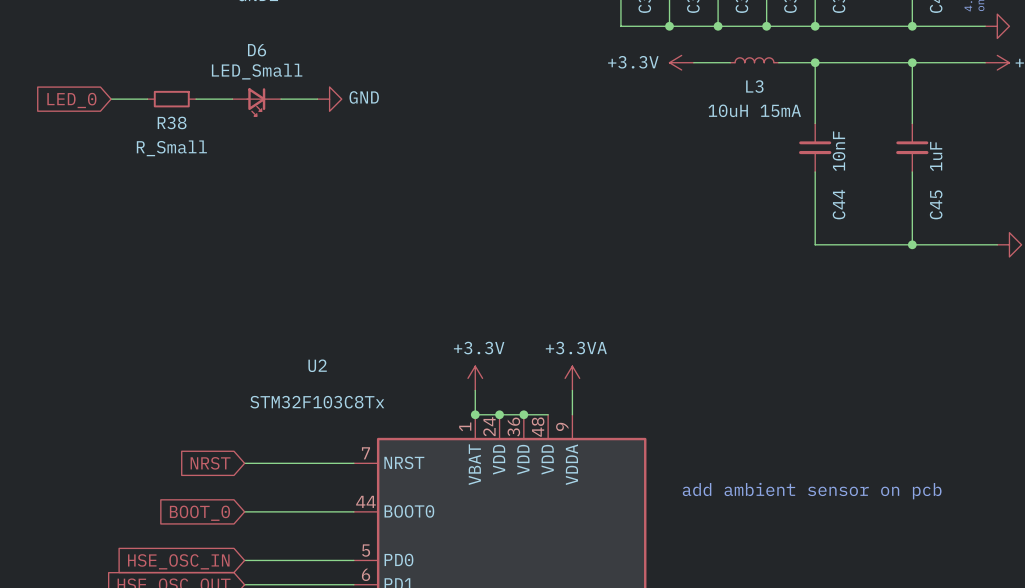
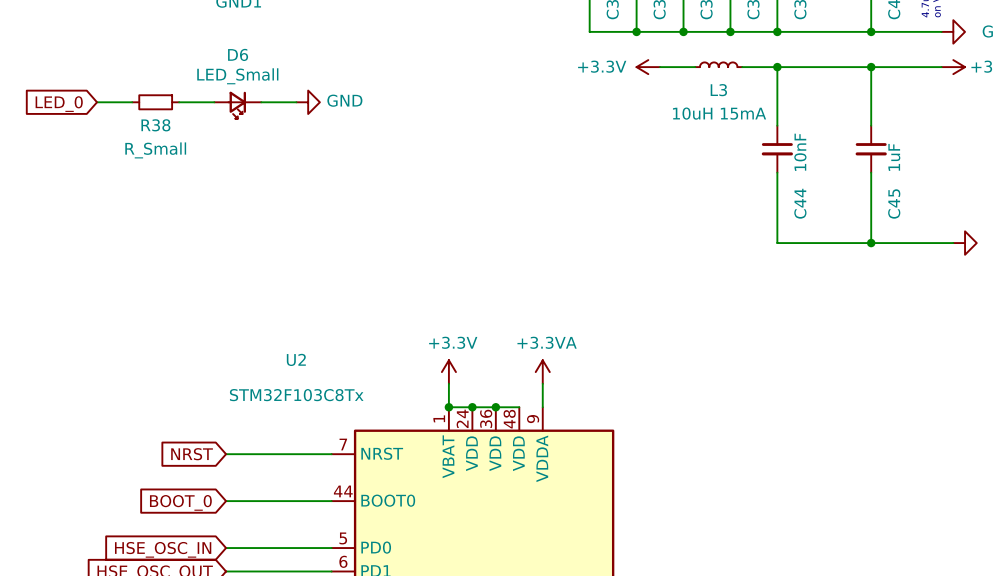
text: add ambient sensor on pcb (812, 491) -> none

